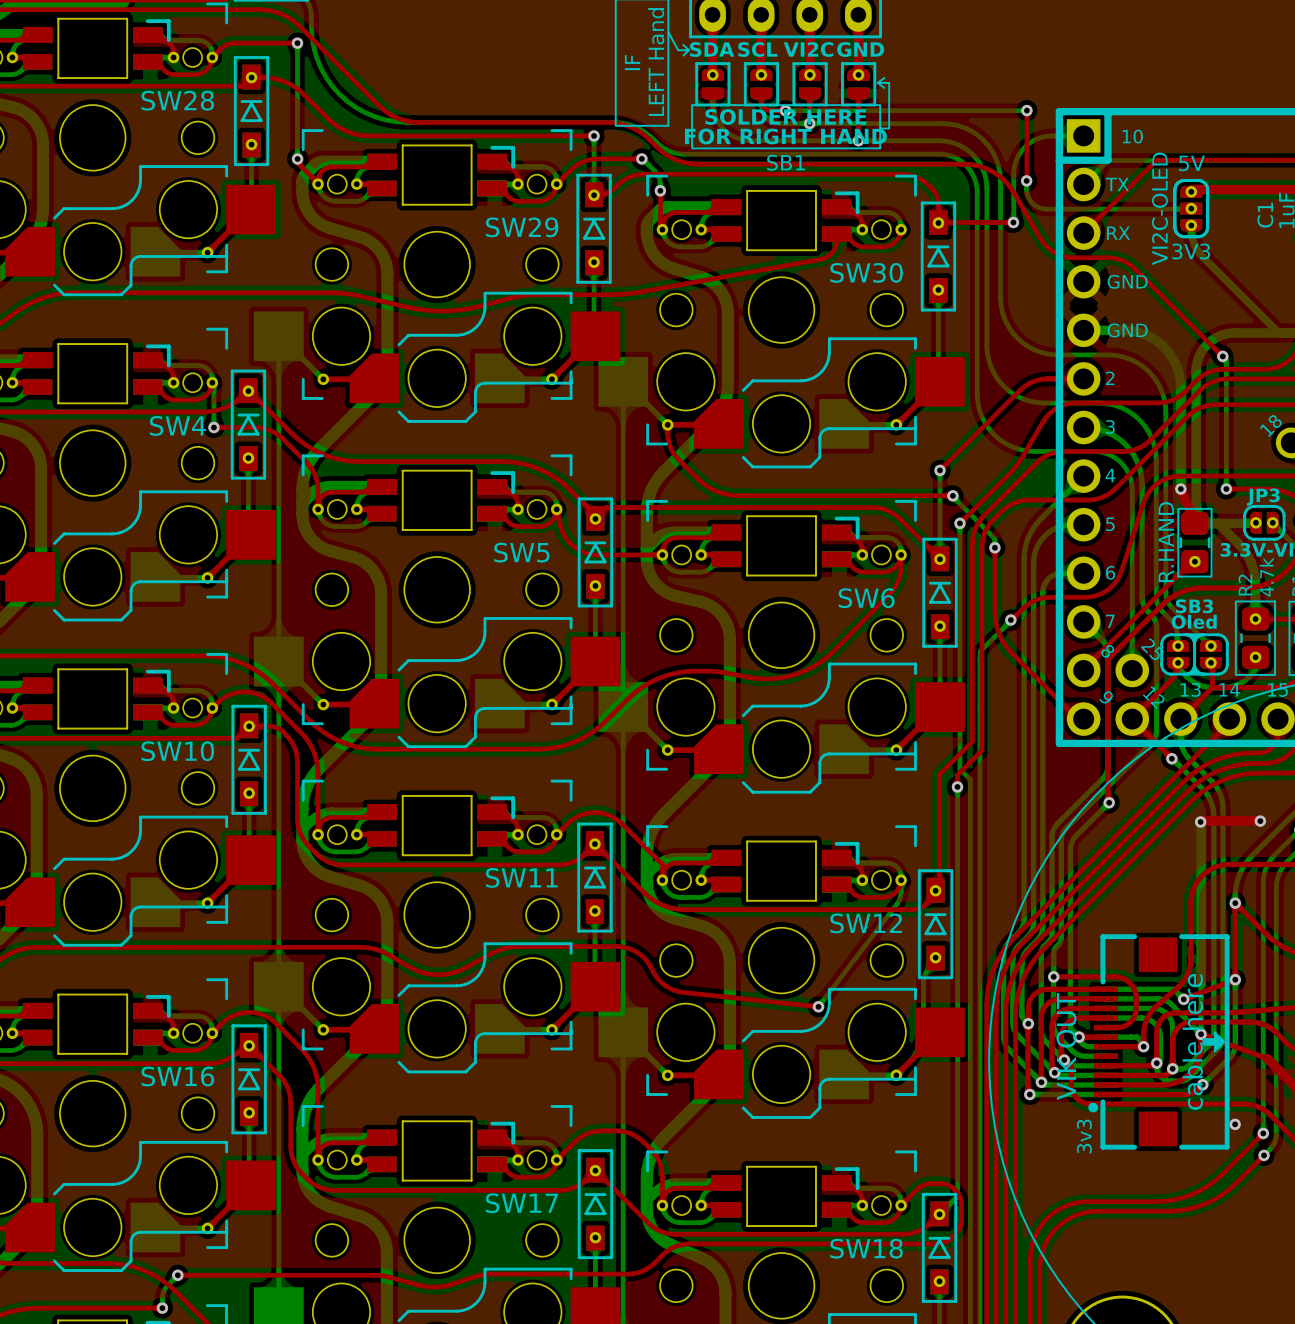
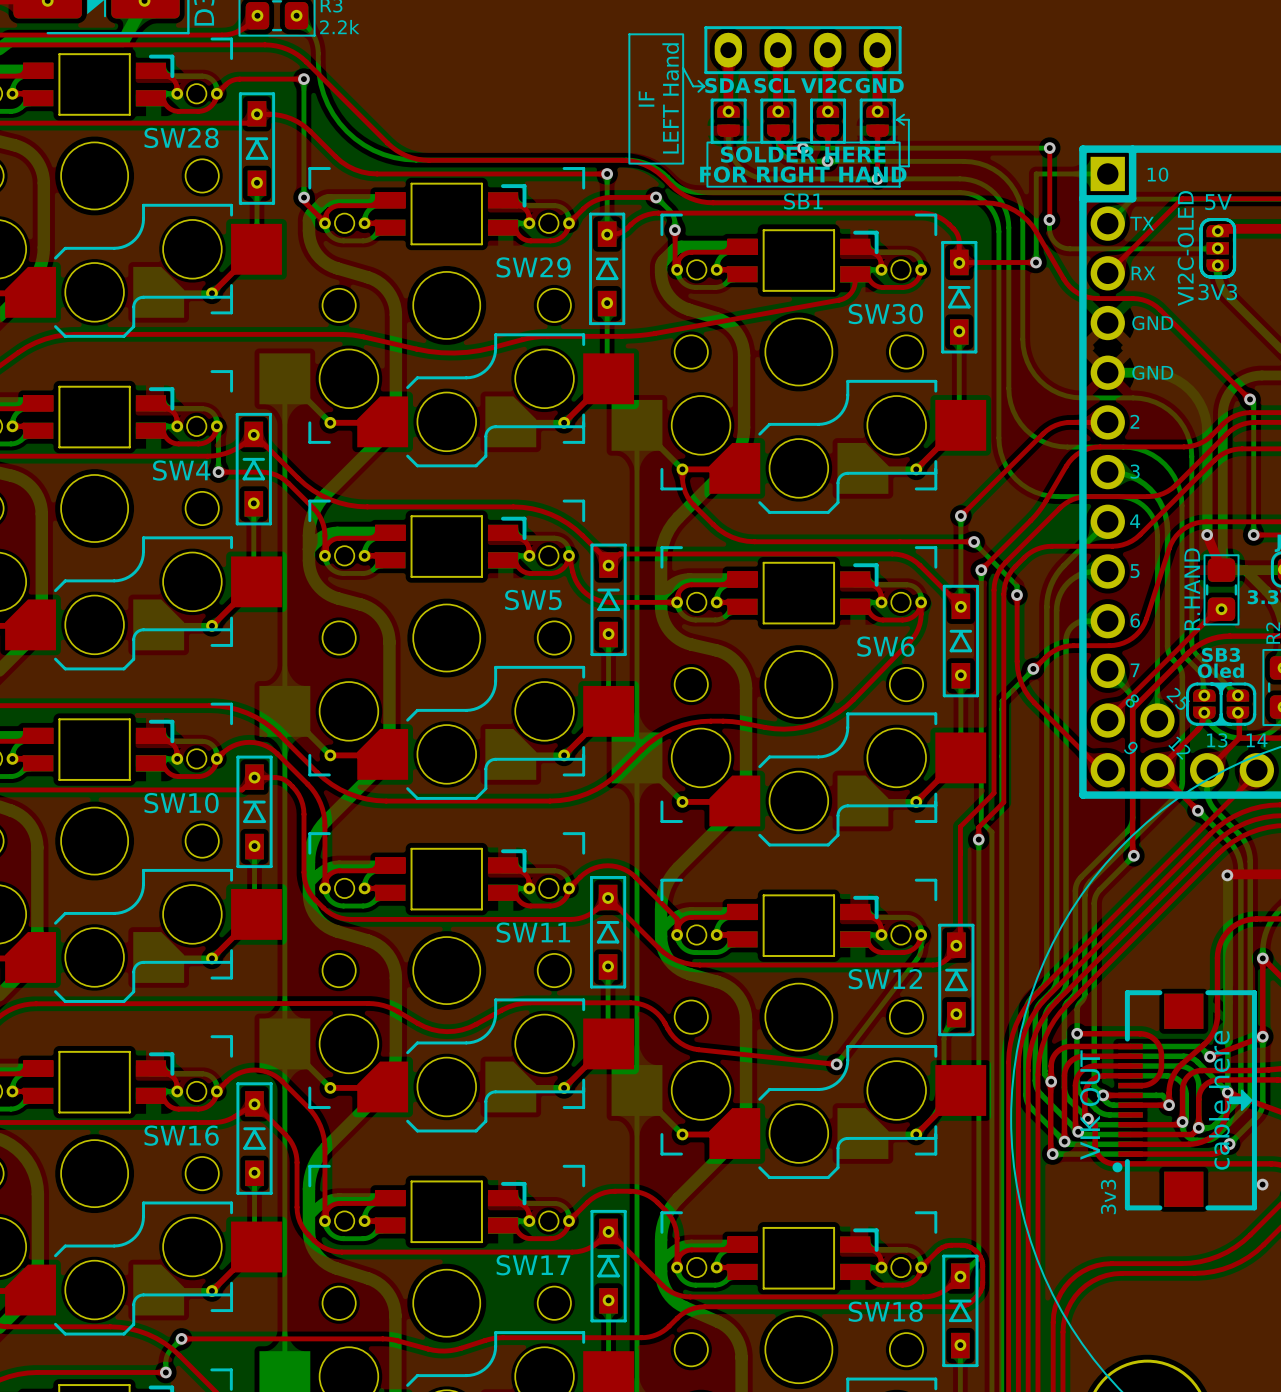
bottom track: (1051, 135) (1039, 138) (1024, 147) (1015, 161) (1013, 174) -> (1075, 173) (1036, 173) (1036, 213)

